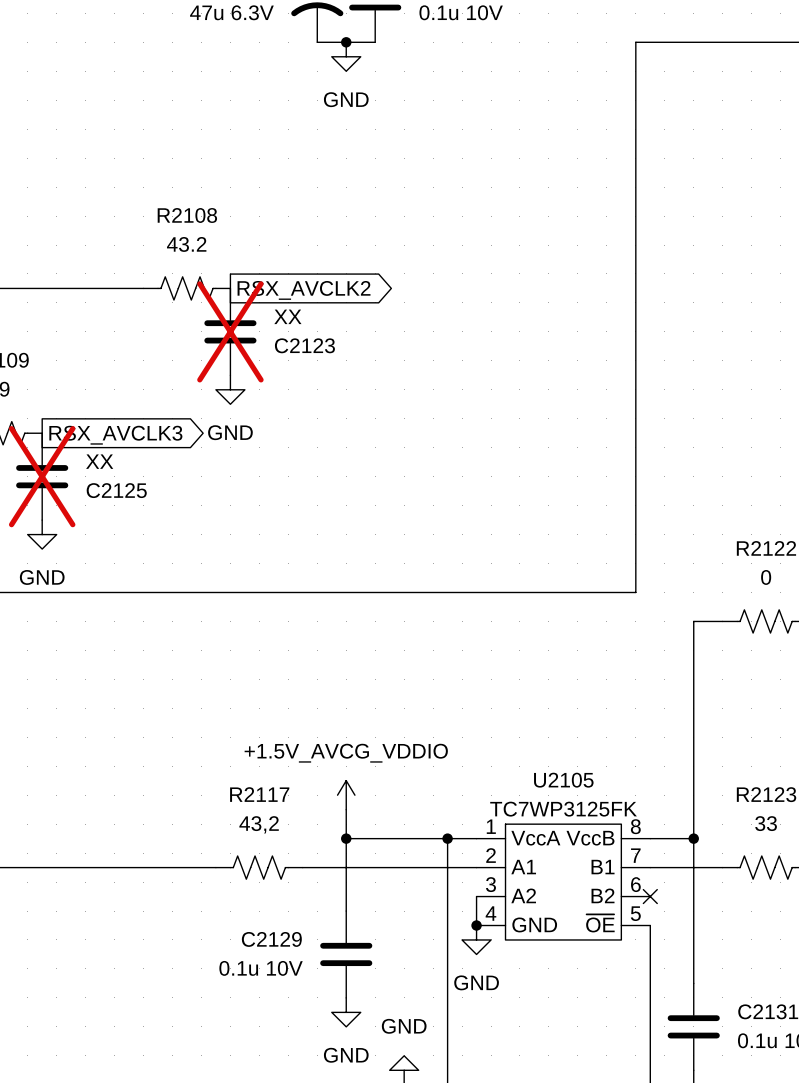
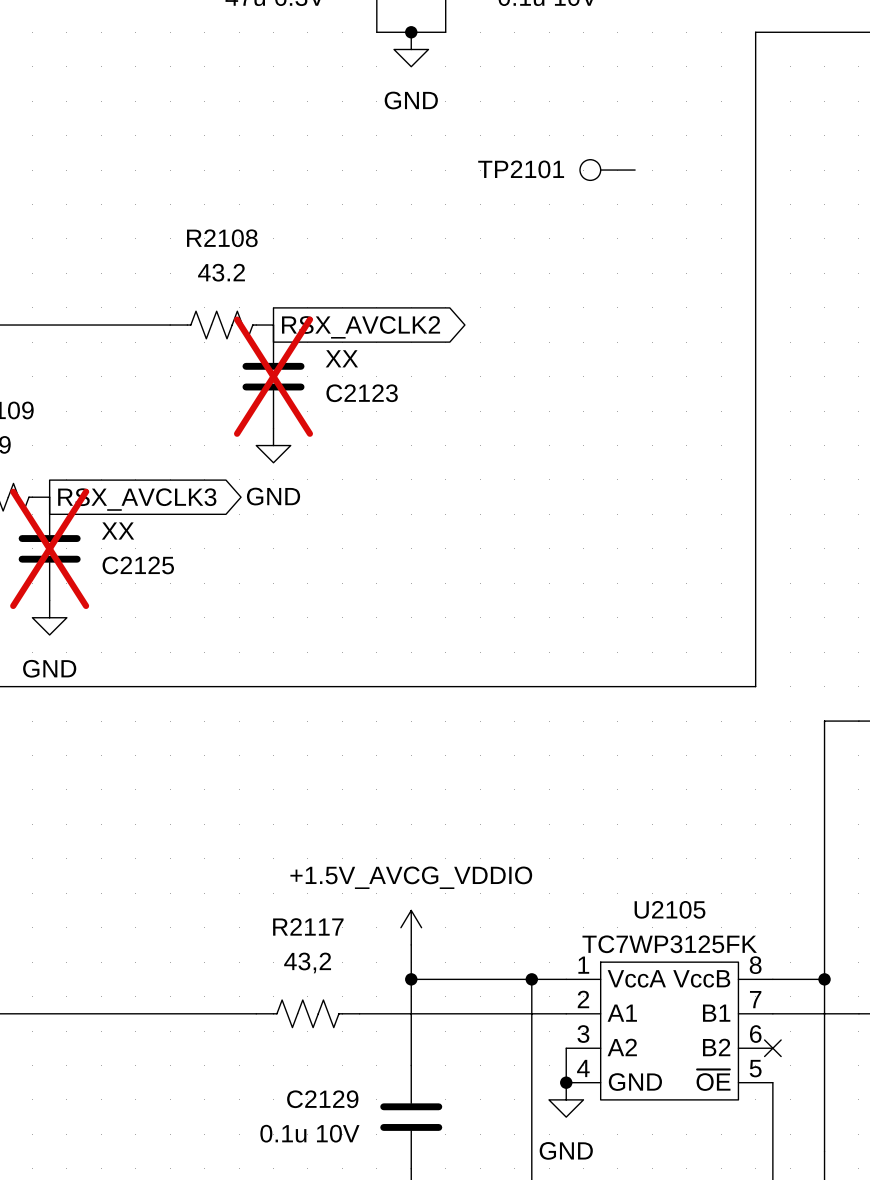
TP2101: none -> (607, 170)

